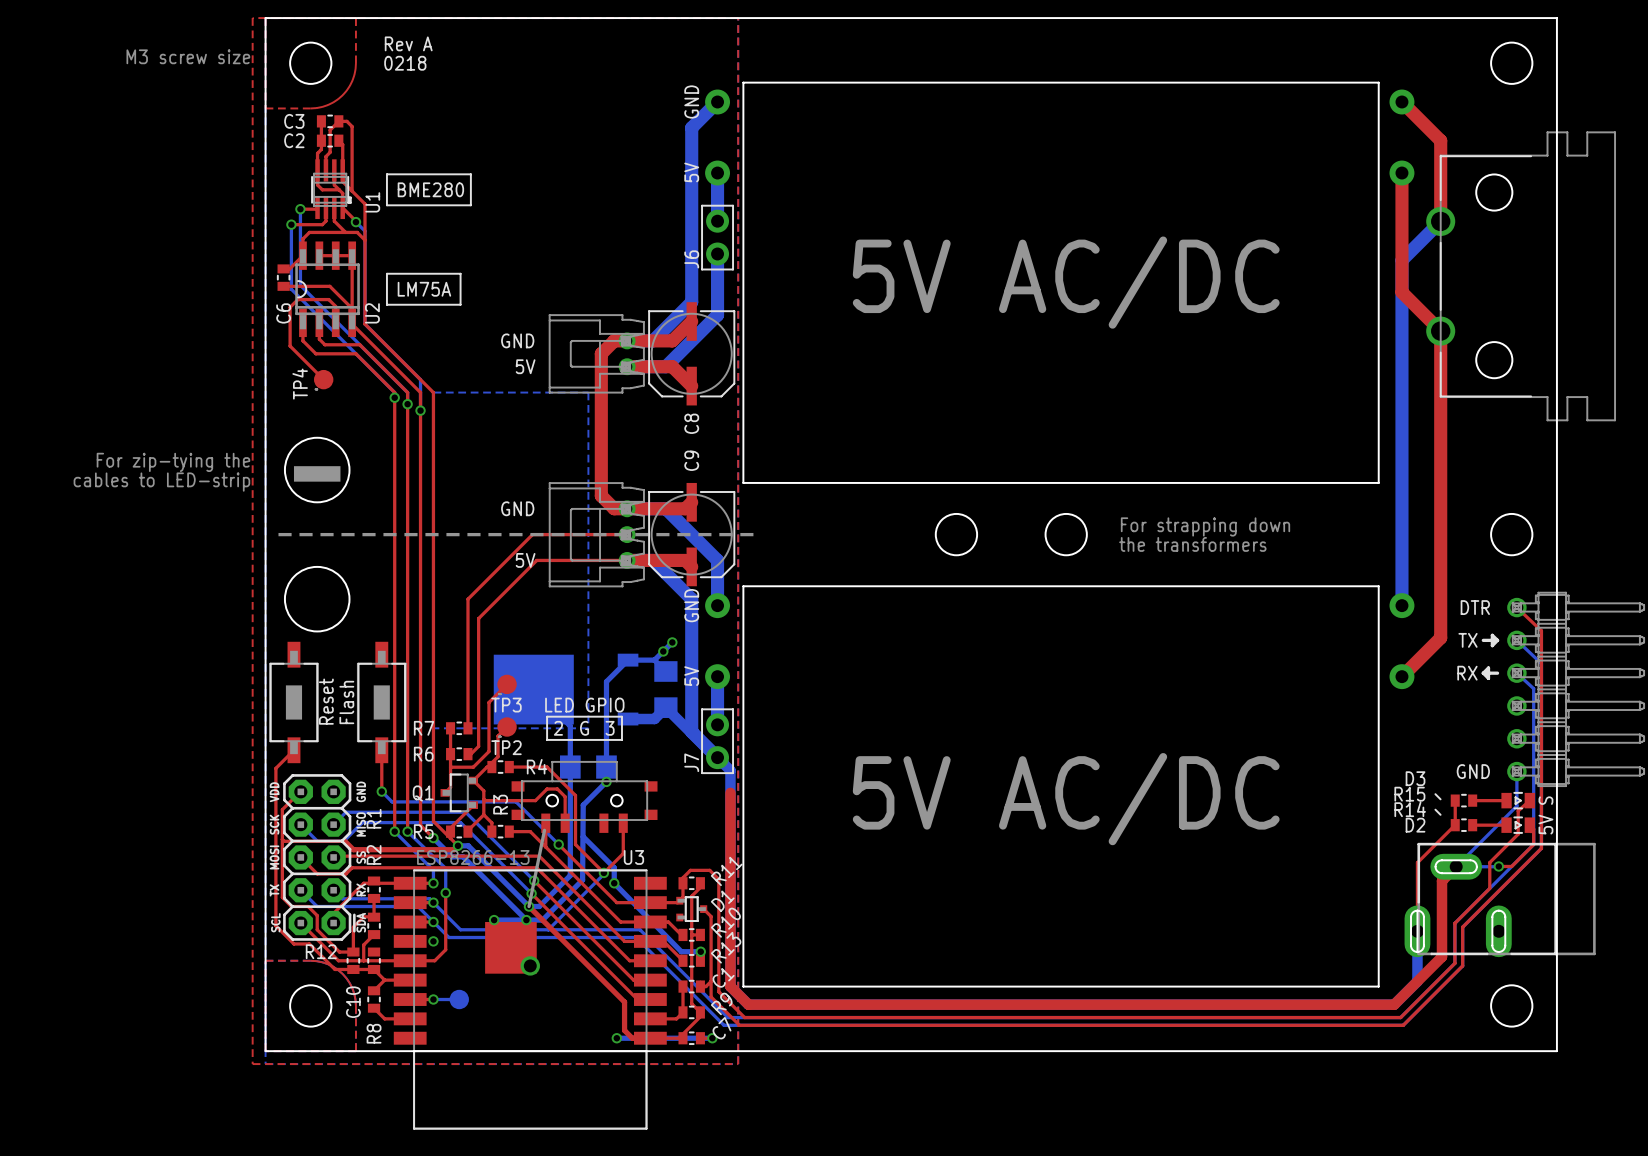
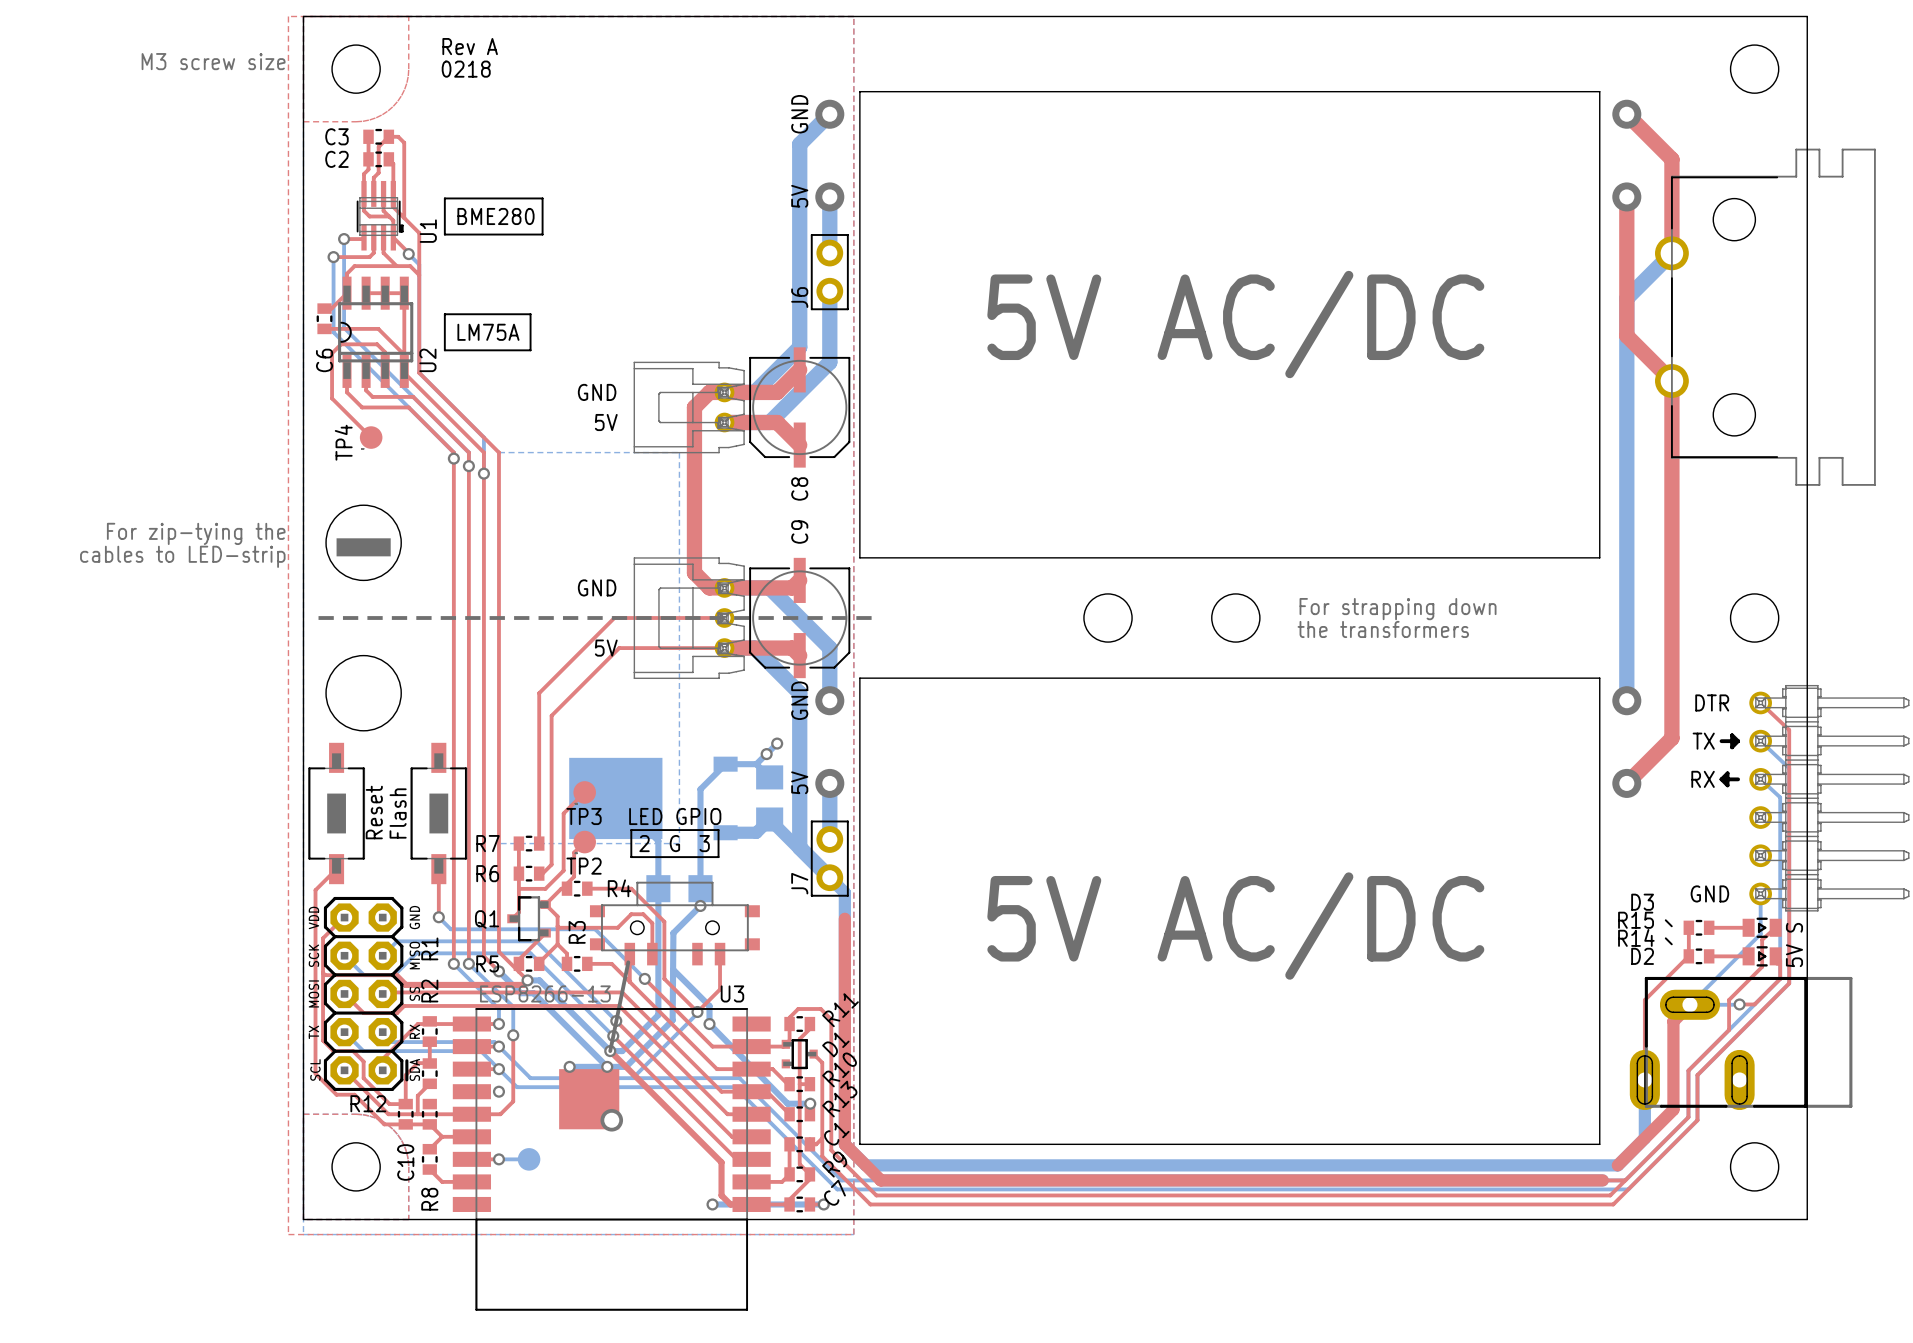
top track: (748, 1004) (1394, 1004) -> none
top track: (744, 1017) (761, 1017) -> (865, 1165) (880, 1180)
top track: none -> (861, 1180) (876, 1195) (1610, 1195) (1625, 1180)
top track width: thin (761, 1017) (1381, 1017) -> thick (880, 1180) (1602, 1180)
top track: (739, 1025) (1403, 1025) -> (855, 1189) (870, 1204) (1613, 1204) (1628, 1189)

